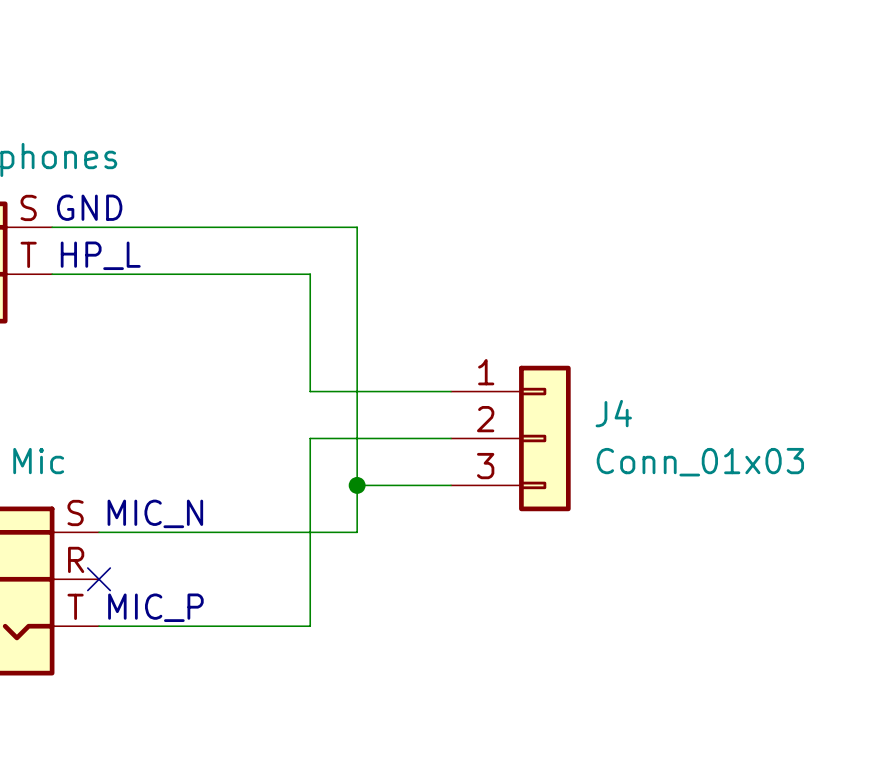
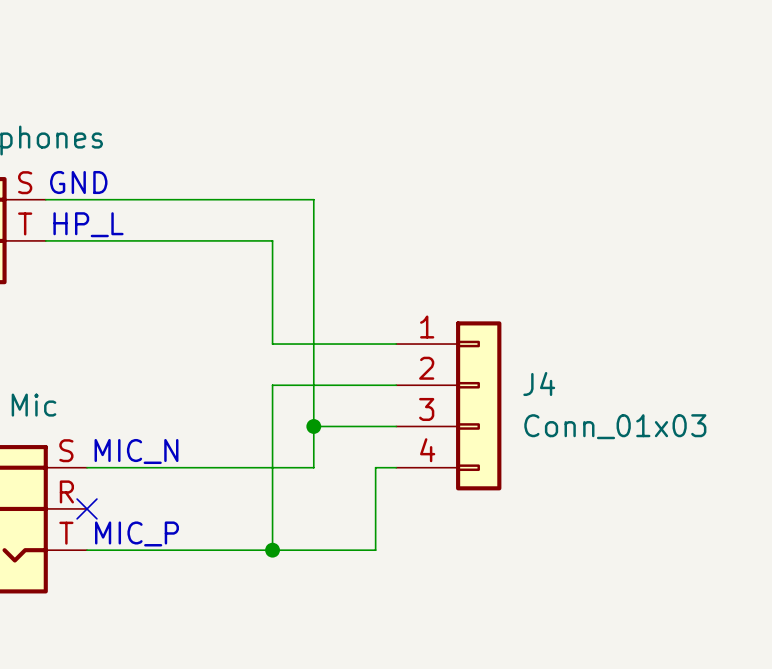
J4 symbol: [451, 365, 571, 512] -> [396, 321, 502, 491]
wire: none -> (396, 467) (375, 467) (375, 550) (272, 550)
junction: none -> (272, 550)

